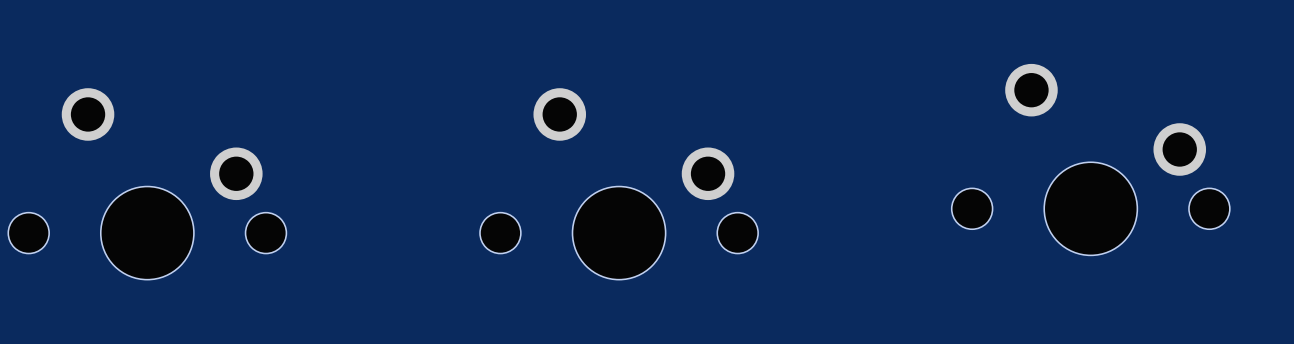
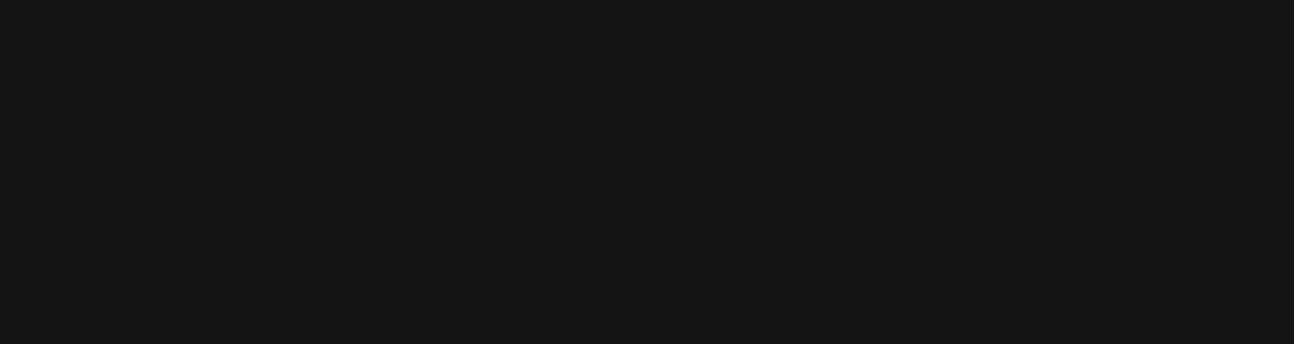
part: (1090, 159) -> none
part: (147, 183) -> none
part: (619, 183) -> none

